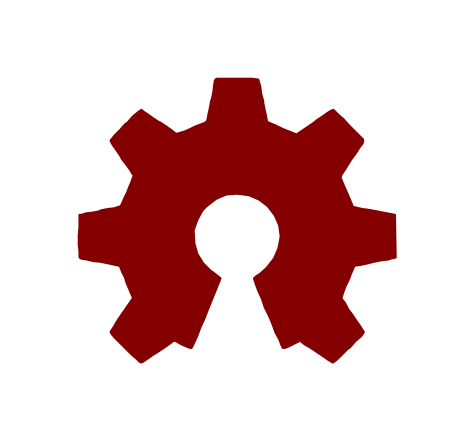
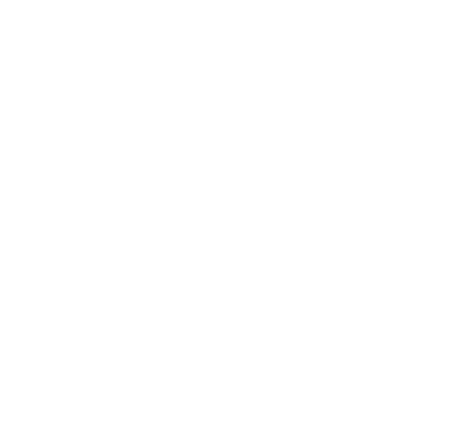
power symbol: (237, 220) -> none

